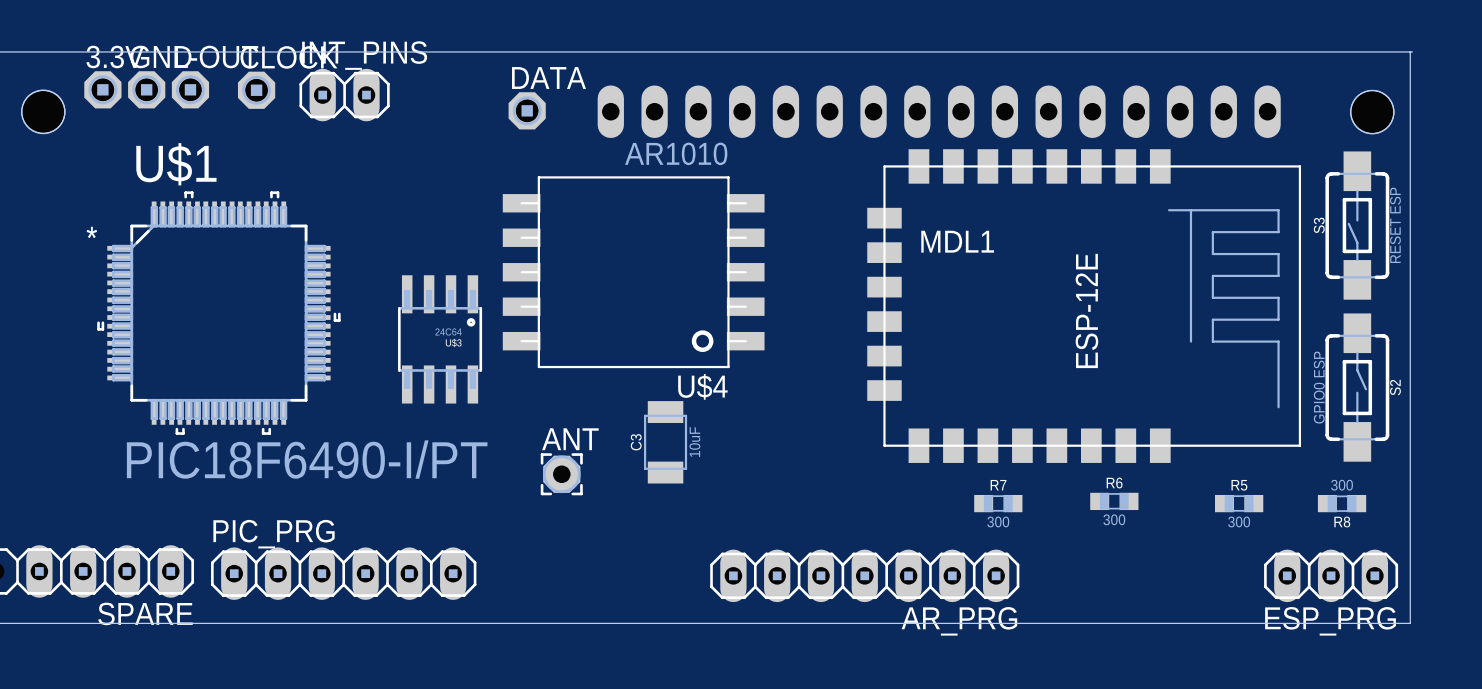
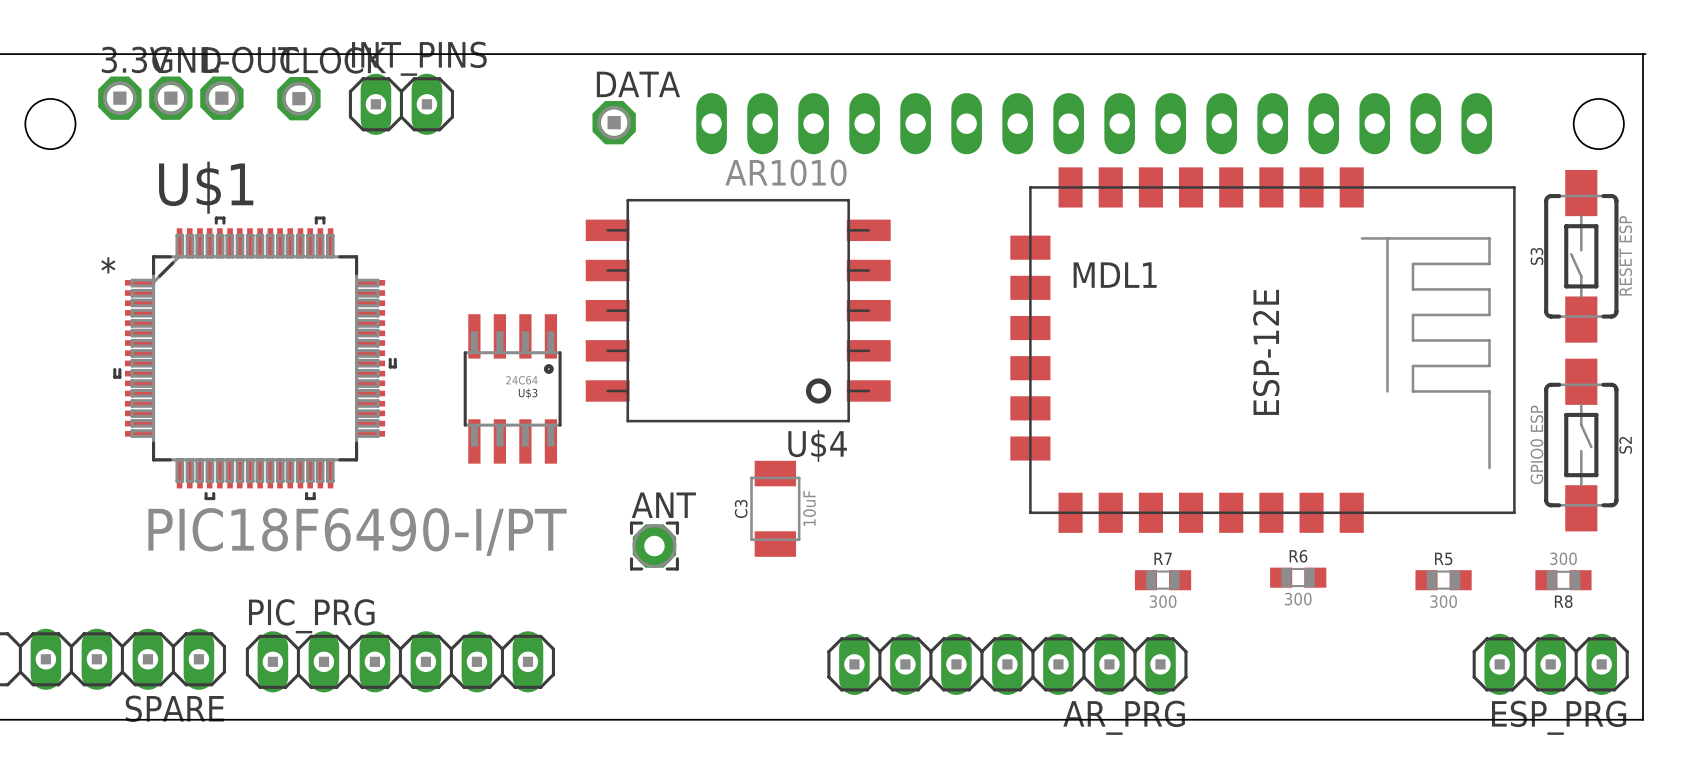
hole: (43, 111) -> none
hole: (1372, 112) -> none

